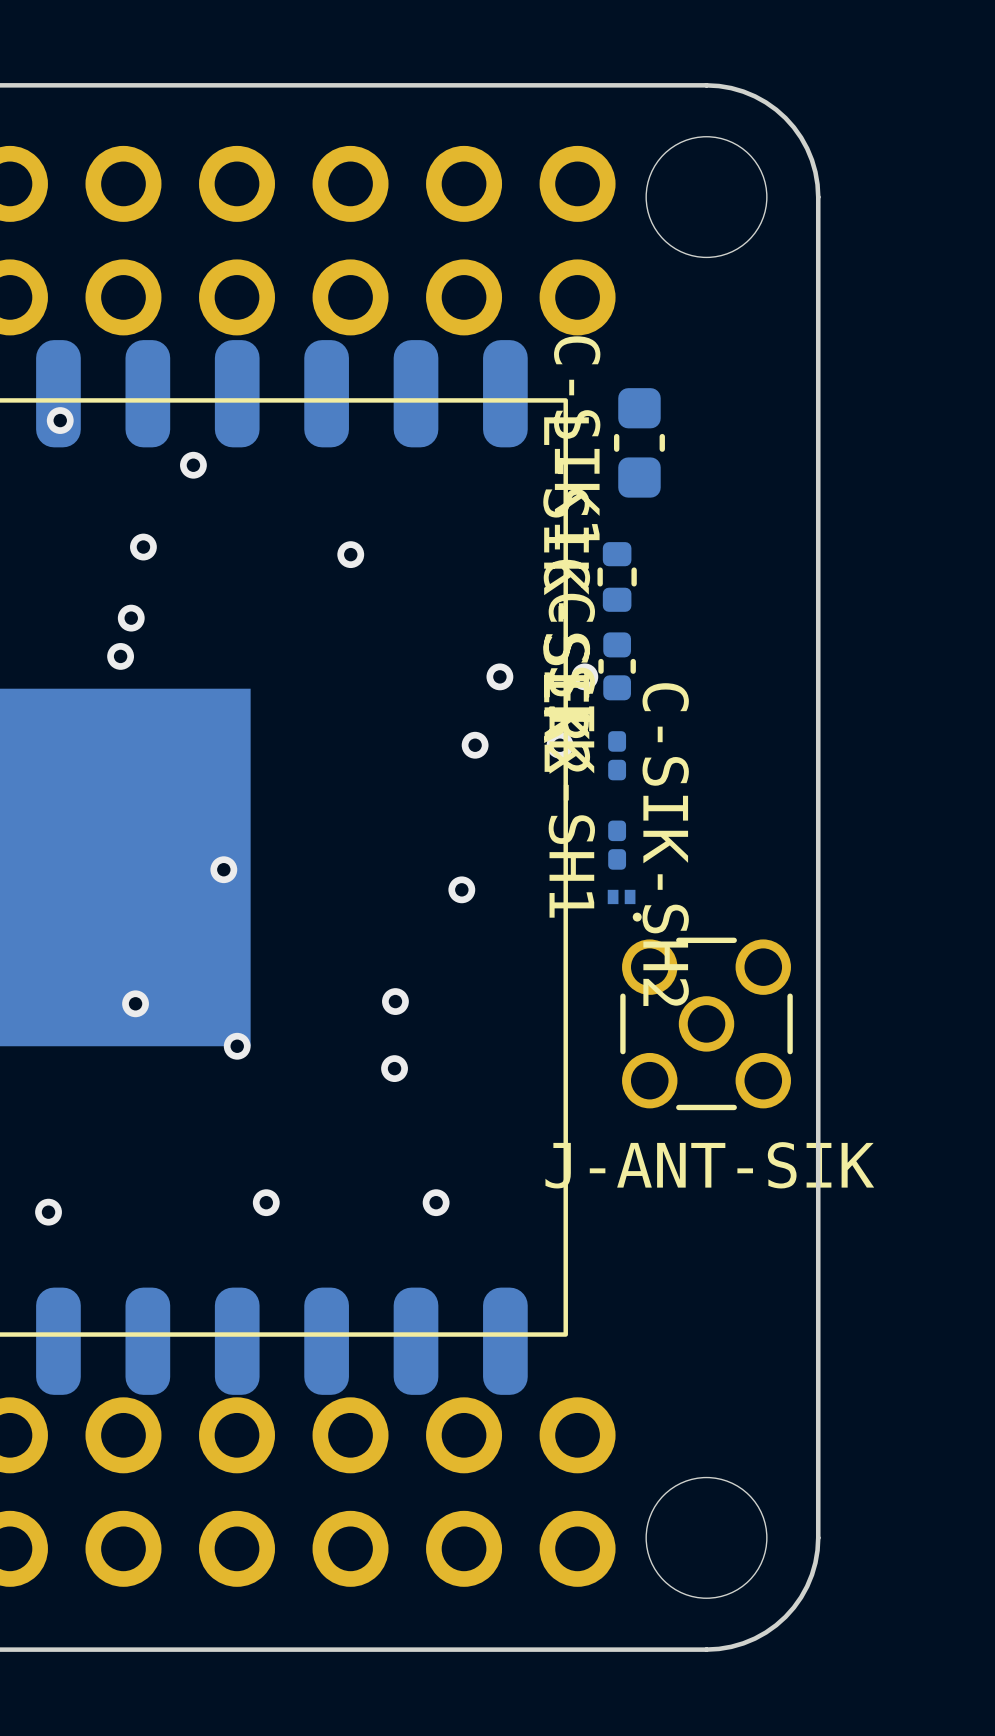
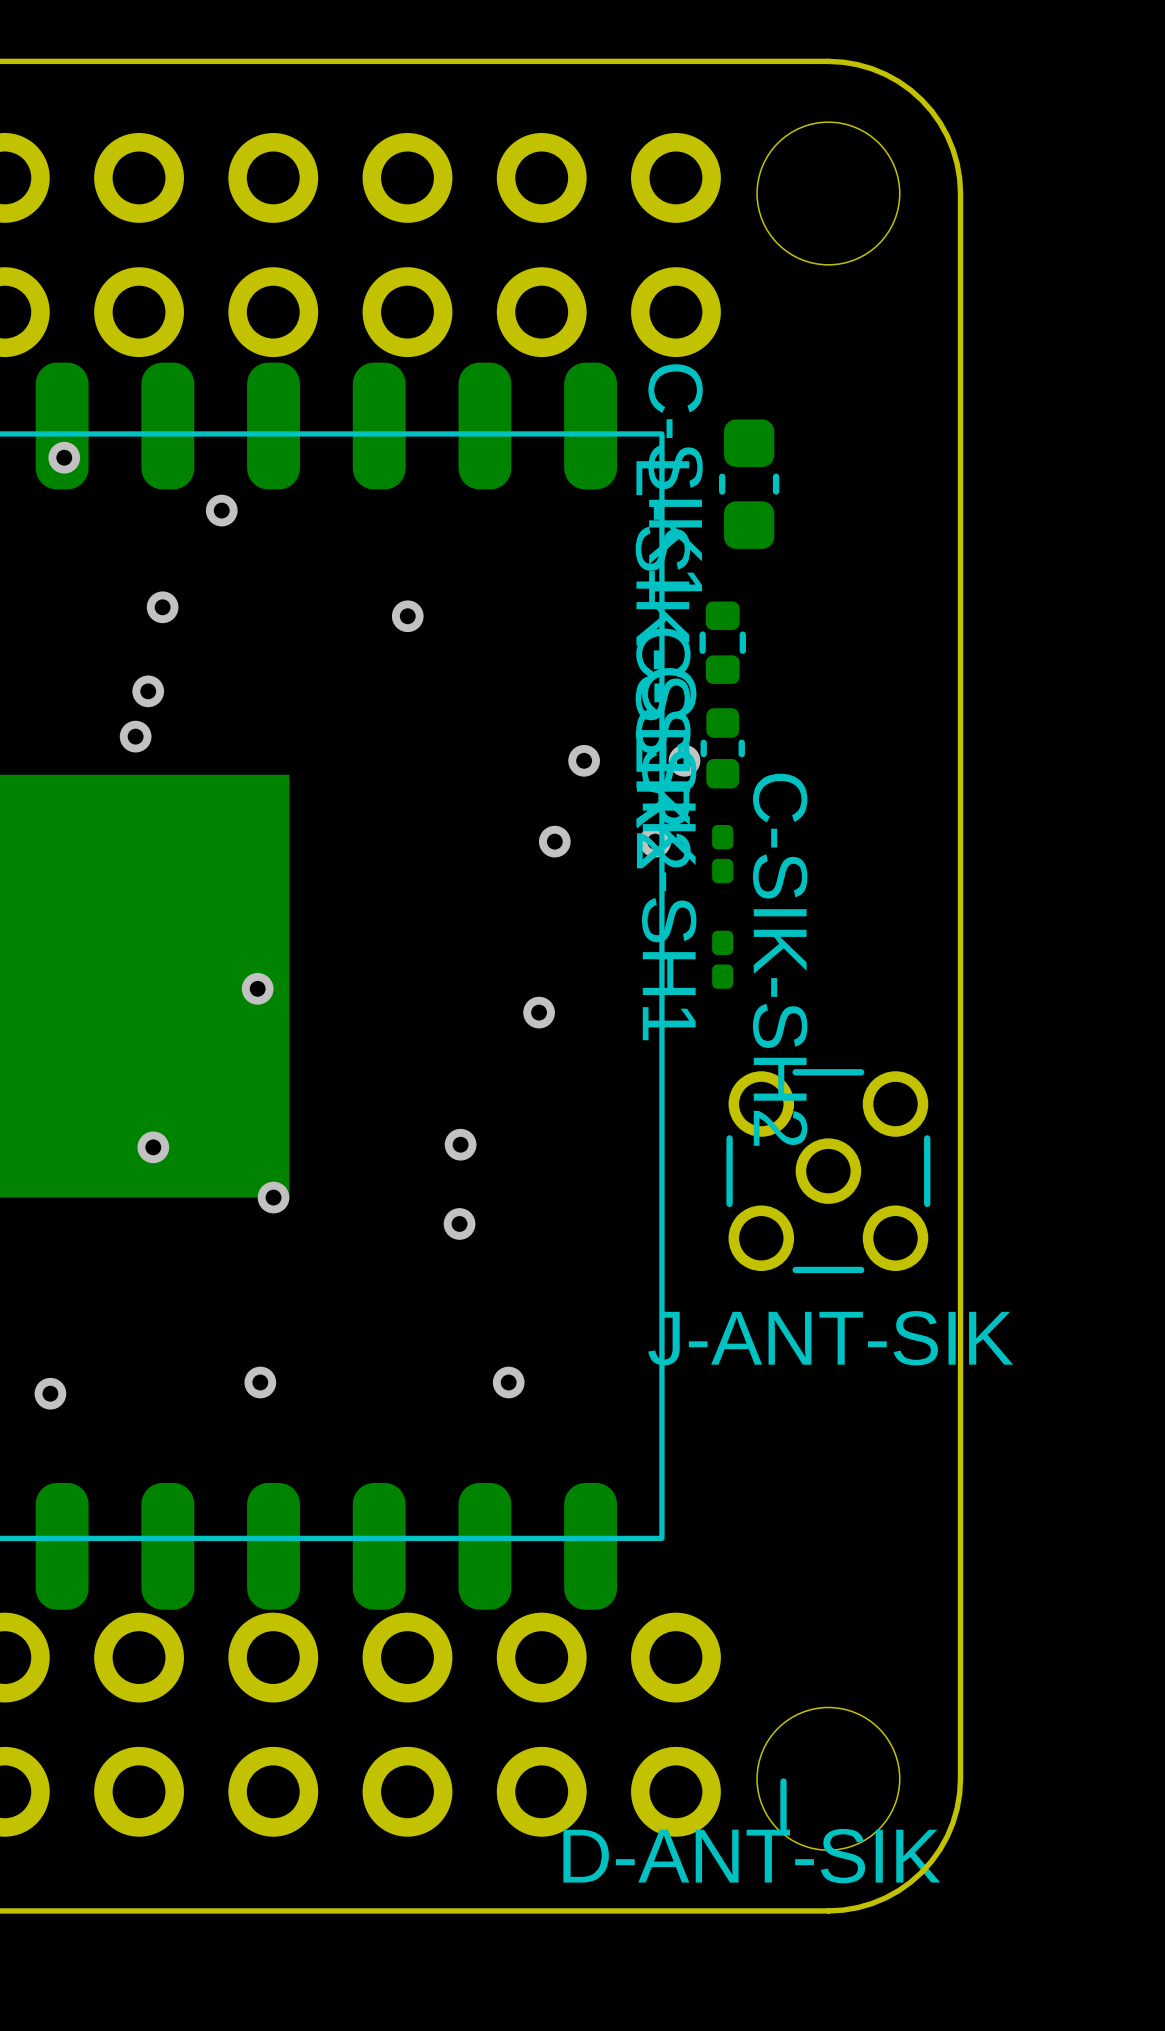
part: (624, 905) -> none
via position: (266, 1202) -> (260, 1382)
D-ANT-SIK: none -> (749, 1805)

